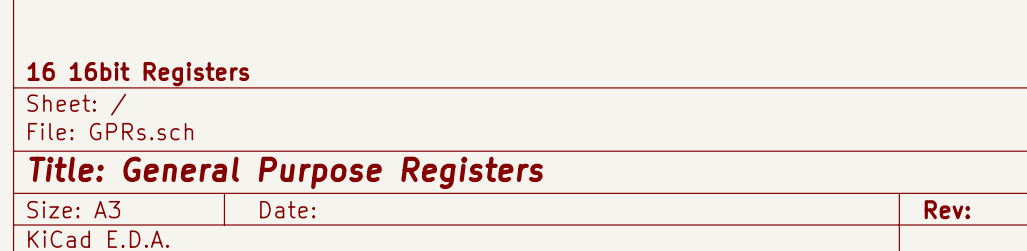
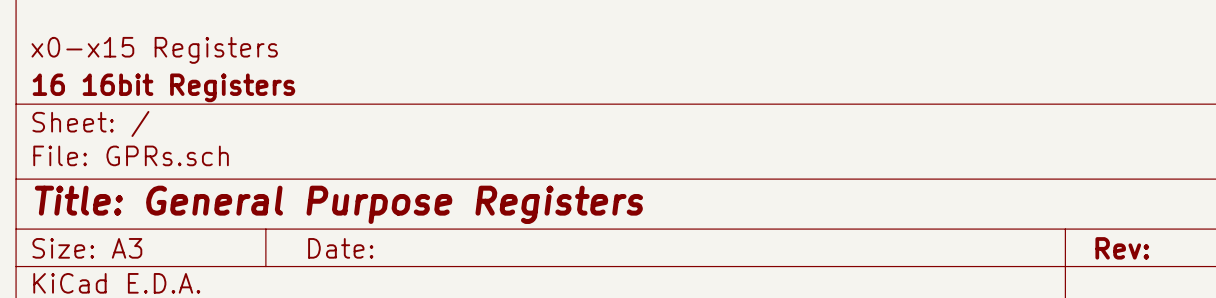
title block: none -> x0-x15 Registers (154, 50)

